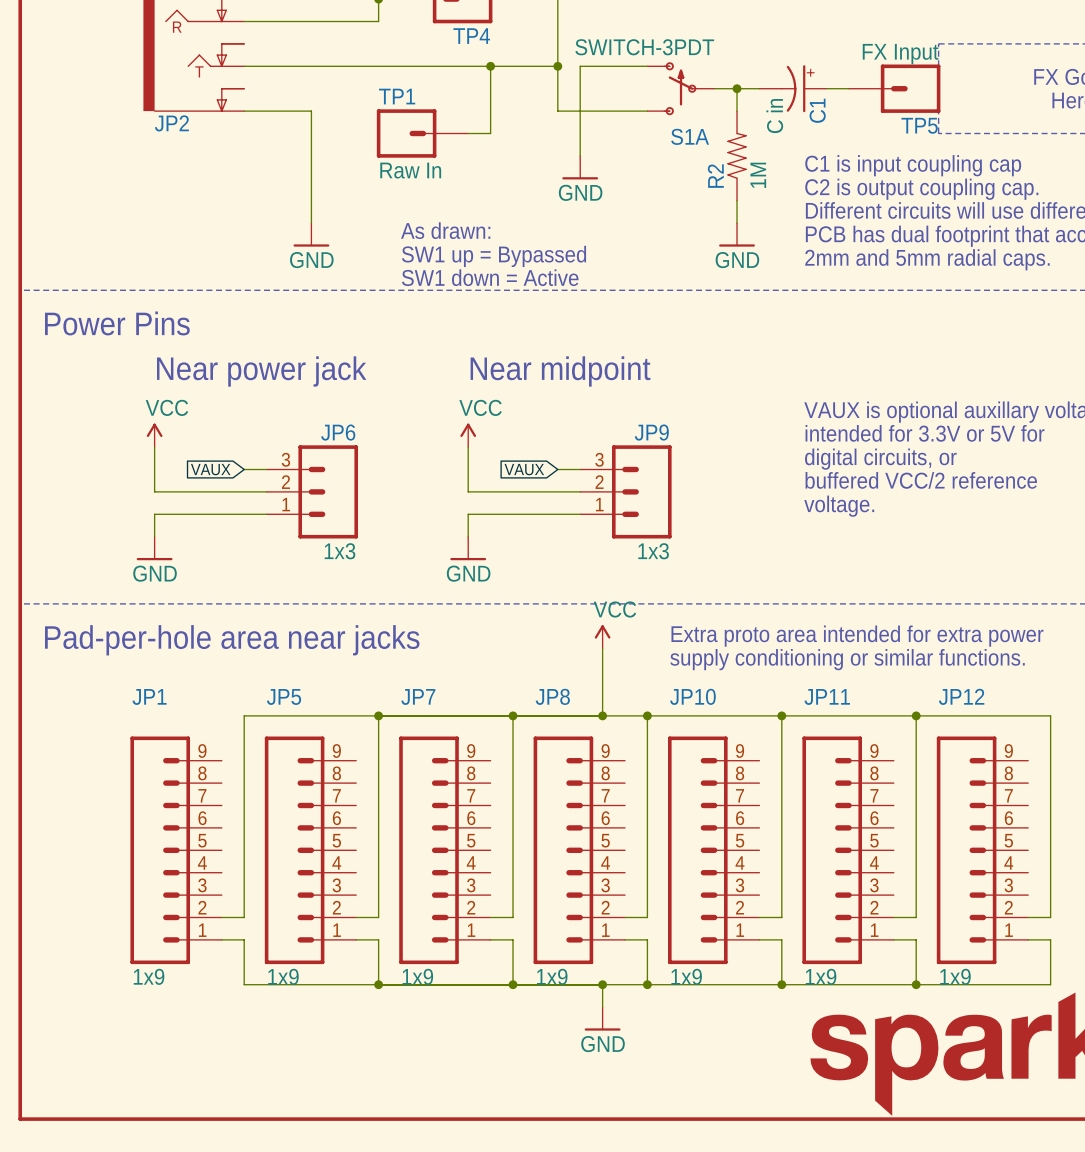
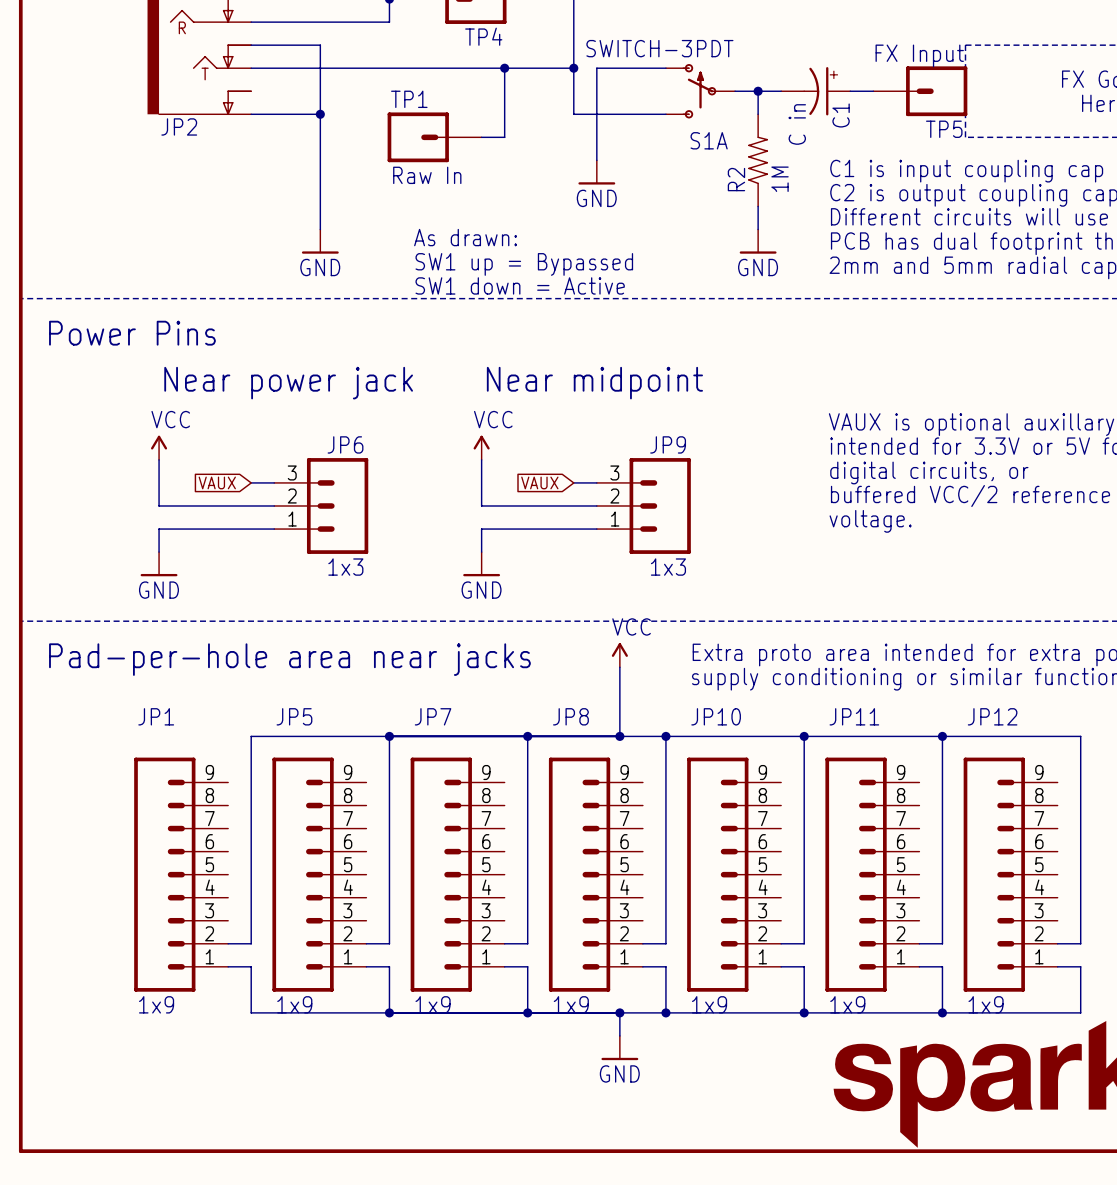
wire: none -> (251, 45) (320, 45) (320, 114)
junction: none -> (320, 114)

